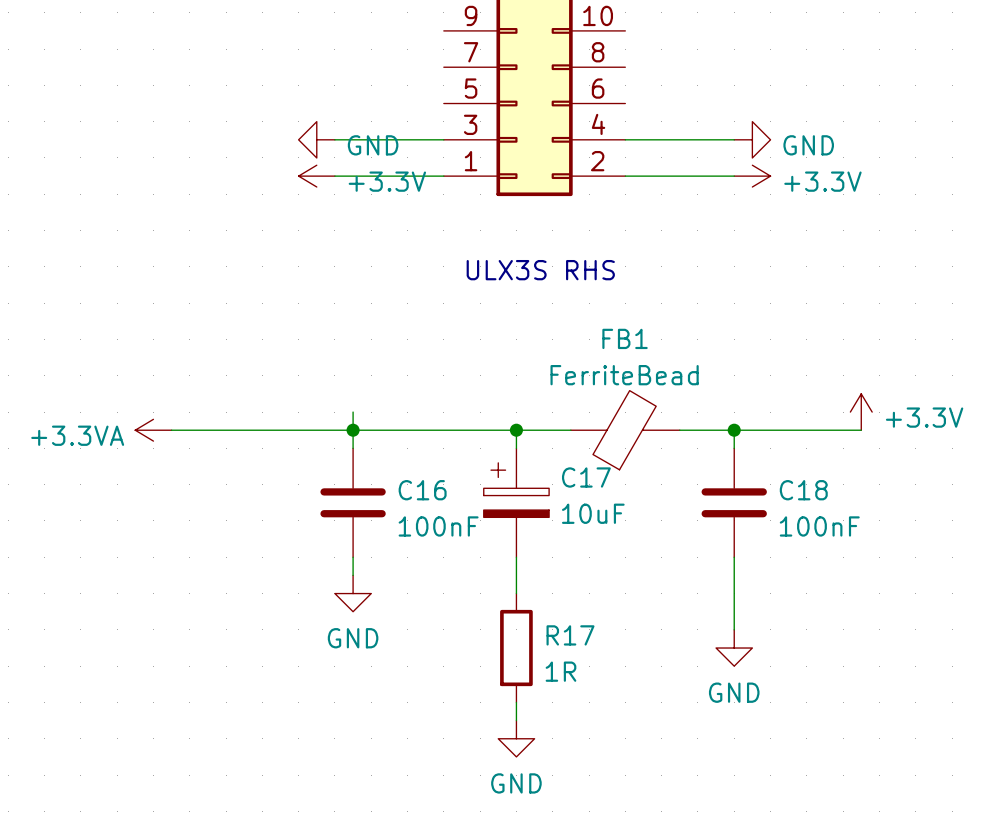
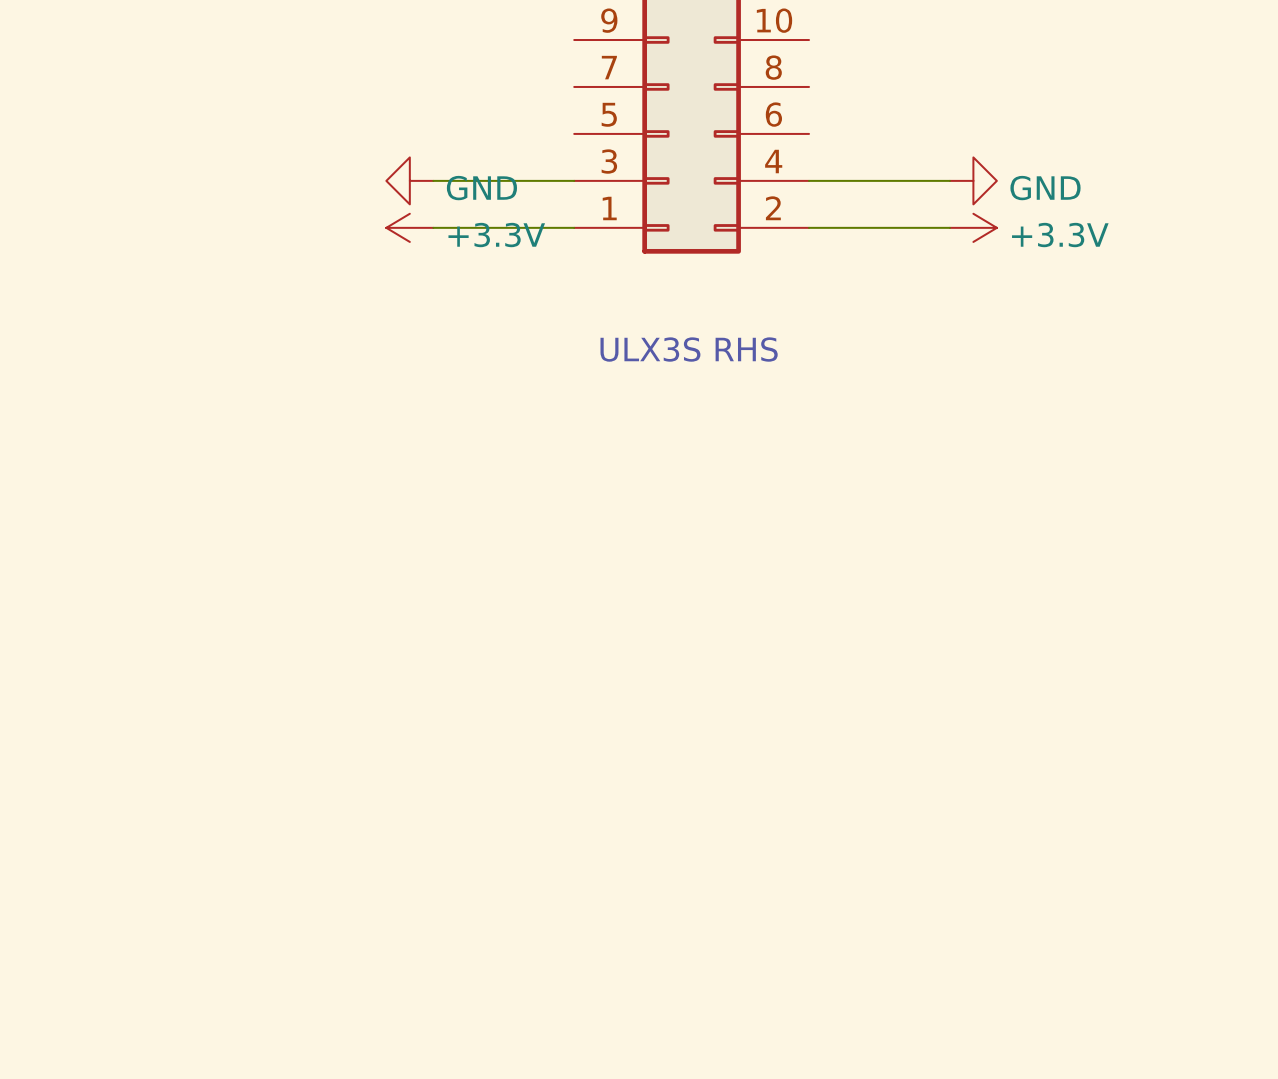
wire: (353, 412) (353, 448) -> none
power symbol: +3.3V (861, 412) -> none
power symbol: +3.3VA (153, 430) -> none
wire: (171, 430) (570, 430) -> none
junction: (353, 430) -> none
wire: (516, 430) (516, 448) -> none
junction: (516, 430) -> none
FB1: FerriteBead (625, 430) -> none
wire: (679, 430) (861, 430) -> none
wire: (734, 430) (734, 448) -> none
junction: (734, 430) -> none
C16: 100nF (353, 502) -> none
C17: 10uF (516, 502) -> none
C18: 100nF (734, 502) -> none
wire: (353, 557) (353, 575) -> none
wire: (516, 557) (516, 593) -> none
wire: (734, 557) (734, 629) -> none
power symbol: GND (353, 593) -> none
R17: 1R (516, 648) -> none
power symbol: GND (734, 648) -> none
wire: (516, 702) (516, 720) -> none
power symbol: GND (516, 738) -> none

